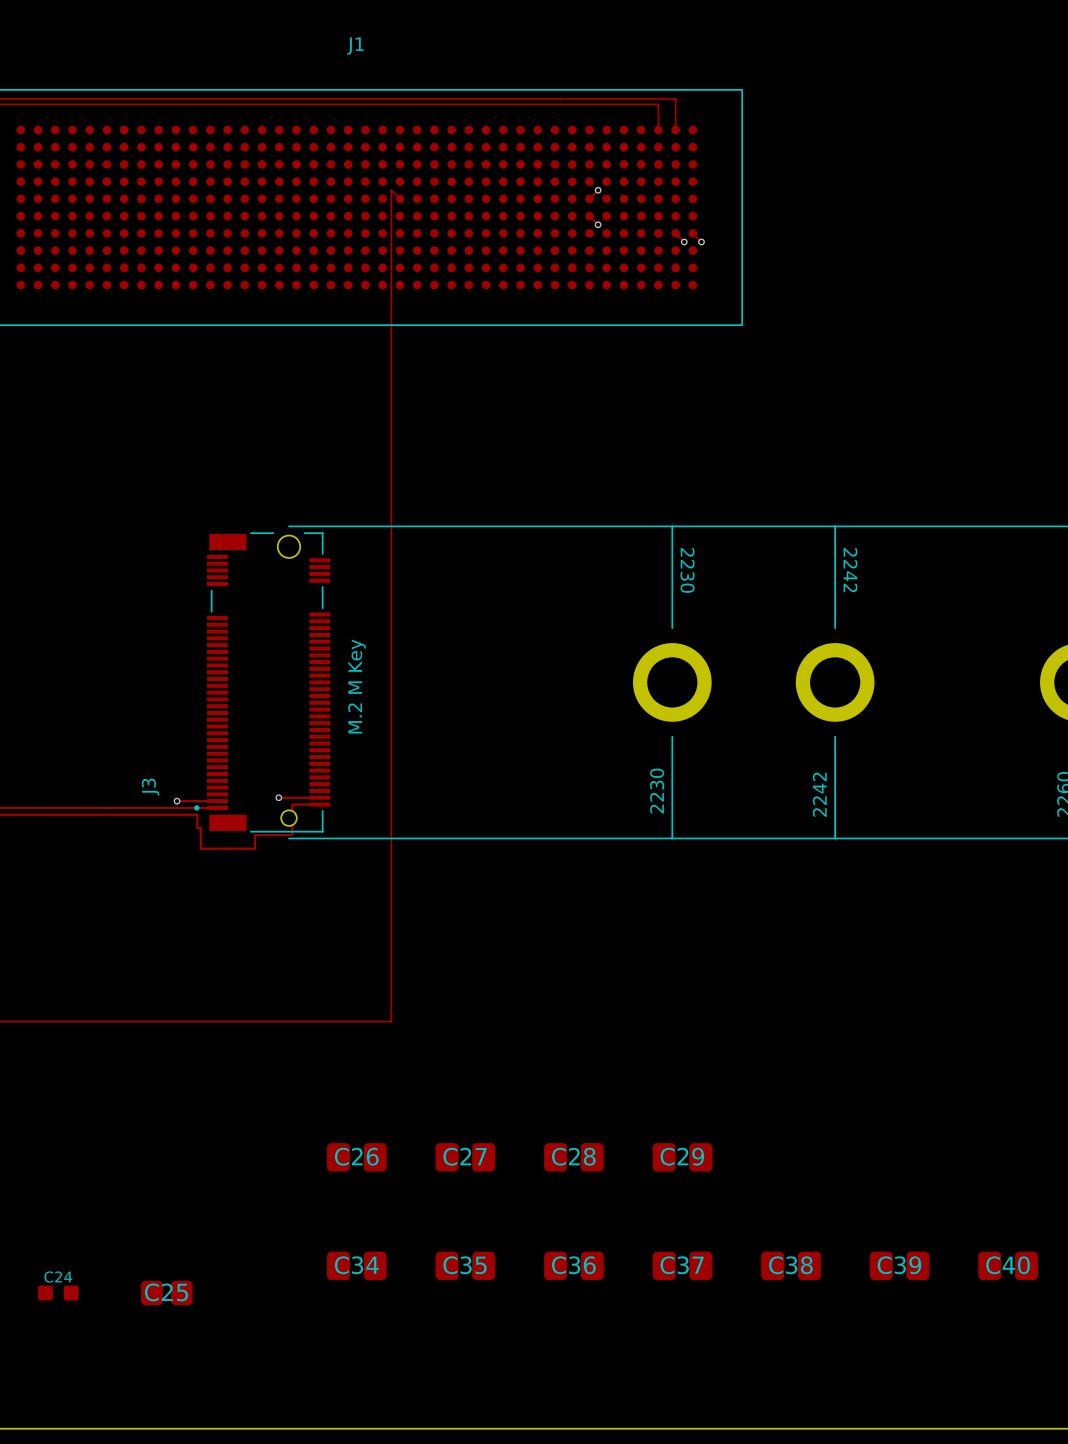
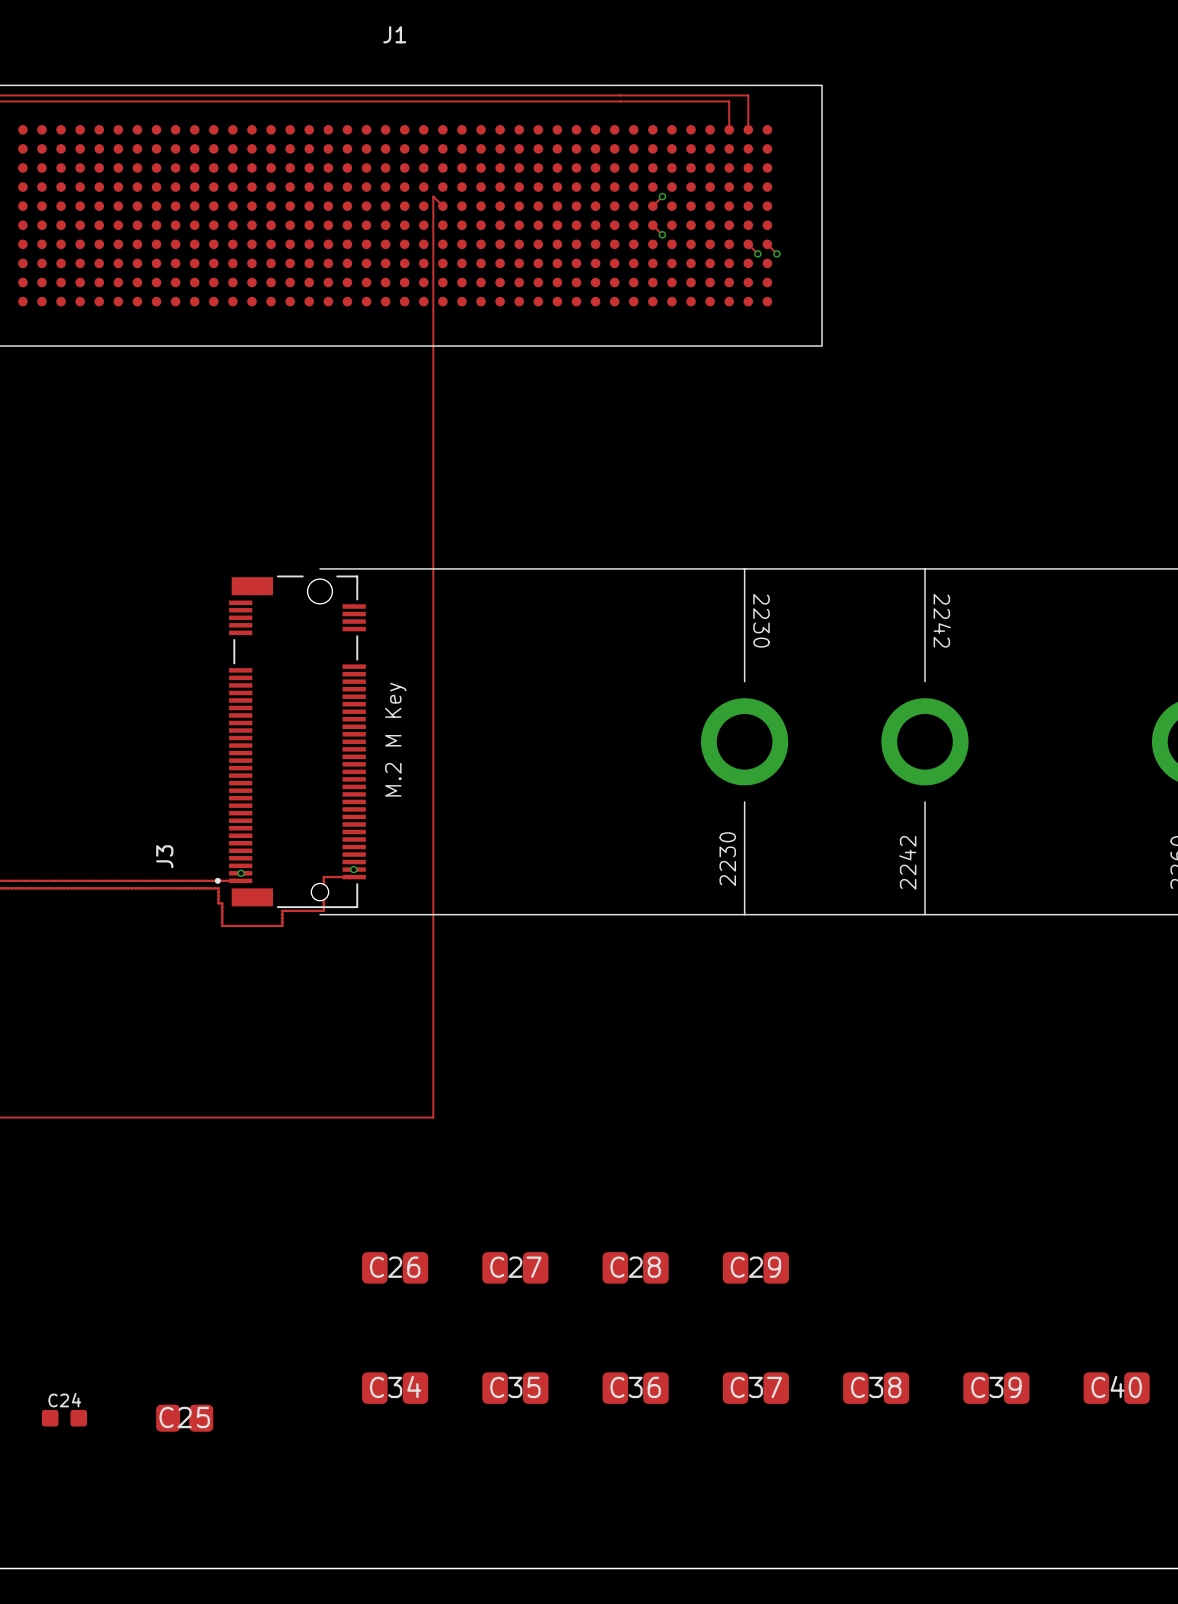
track: (278, 797) (319, 797) -> none
via: (278, 797) -> none
via: none -> (353, 869)
track: (177, 801) (217, 801) -> none
via: (177, 801) -> none
via: none -> (241, 873)

